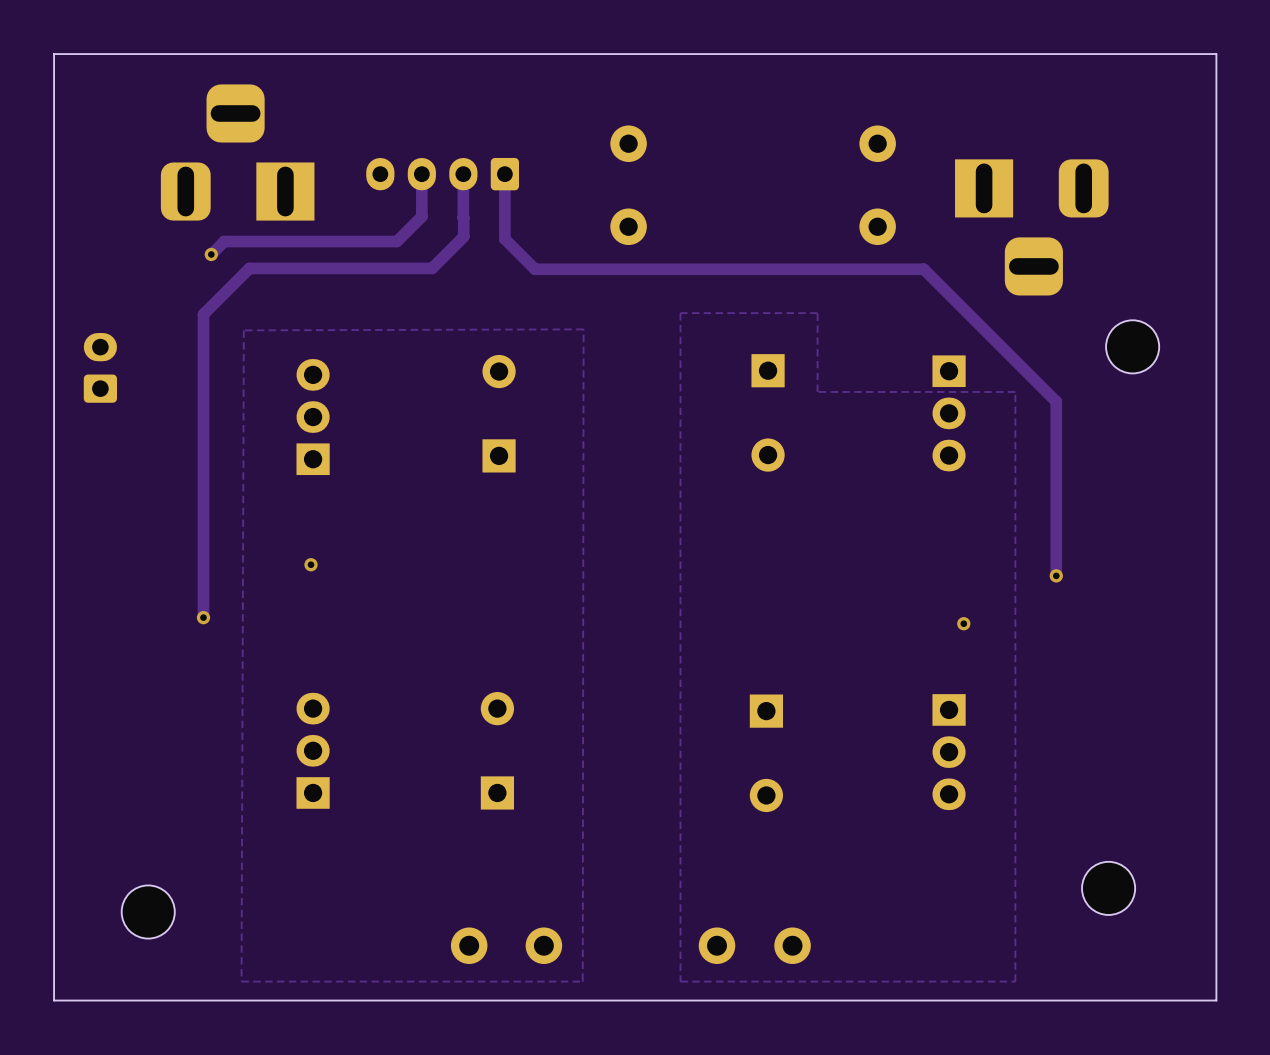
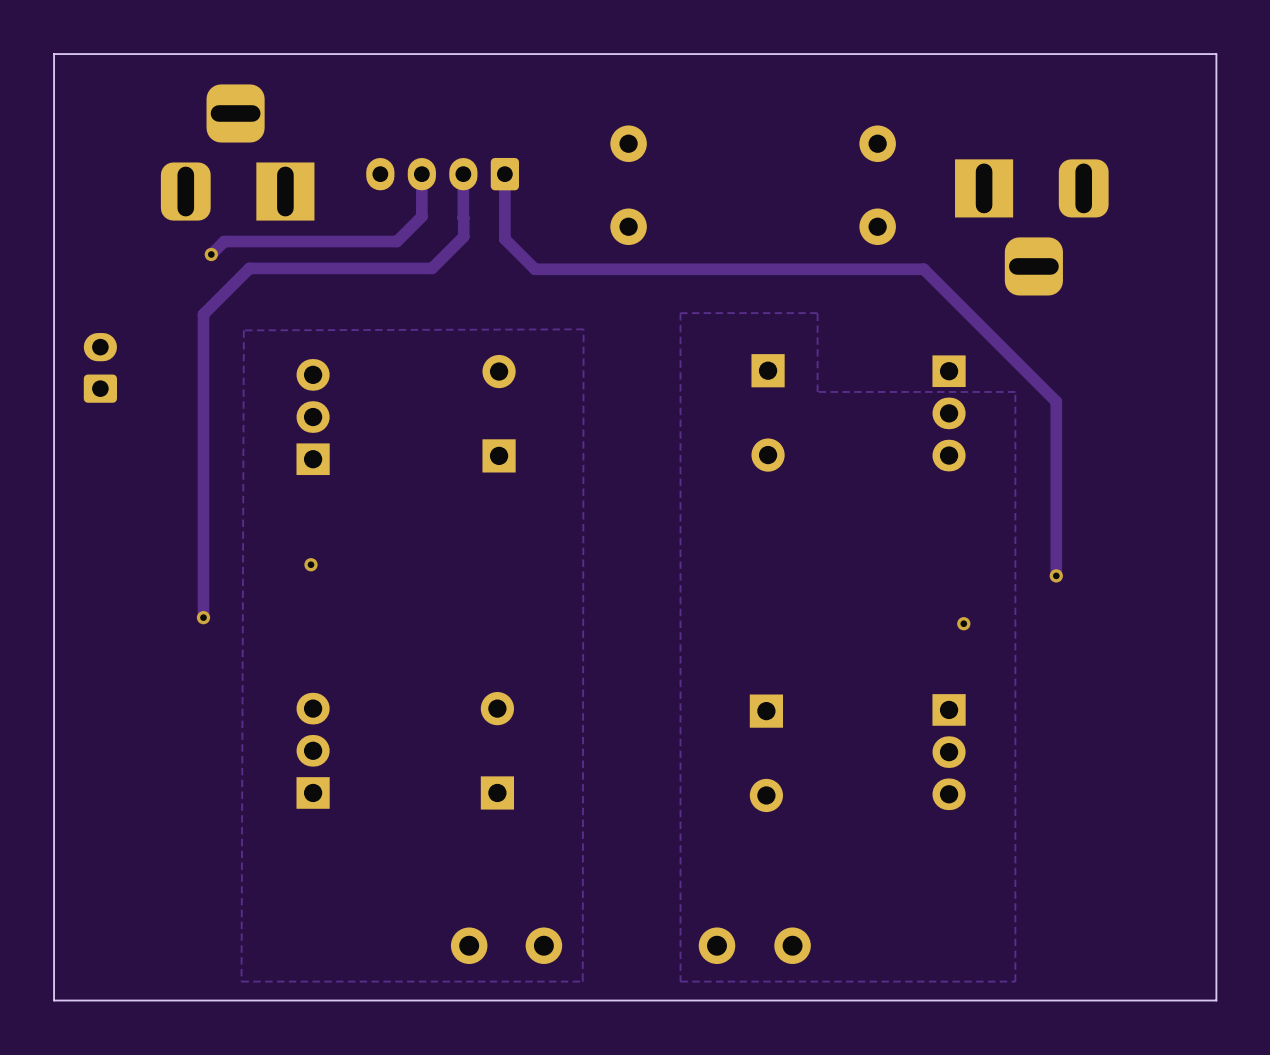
part: (1132, 346) -> none
part: (1108, 888) -> none
part: (148, 912) -> none

